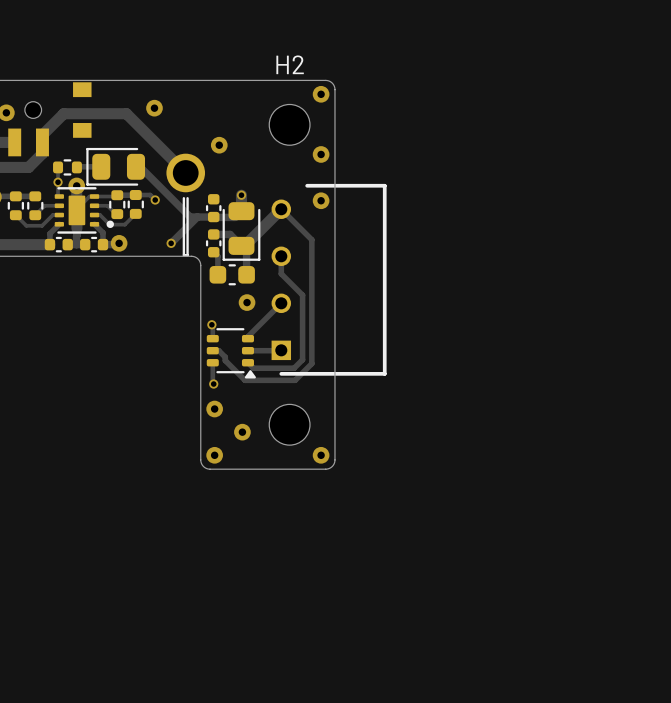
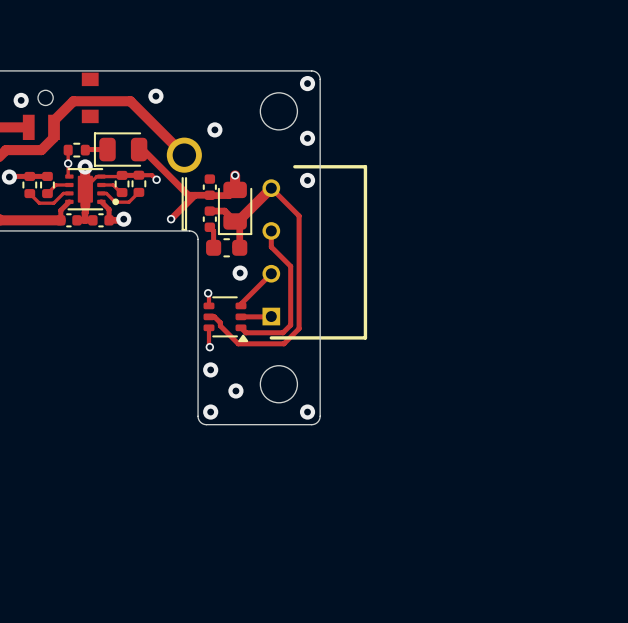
H2 name: H2 (290, 64) -> none

